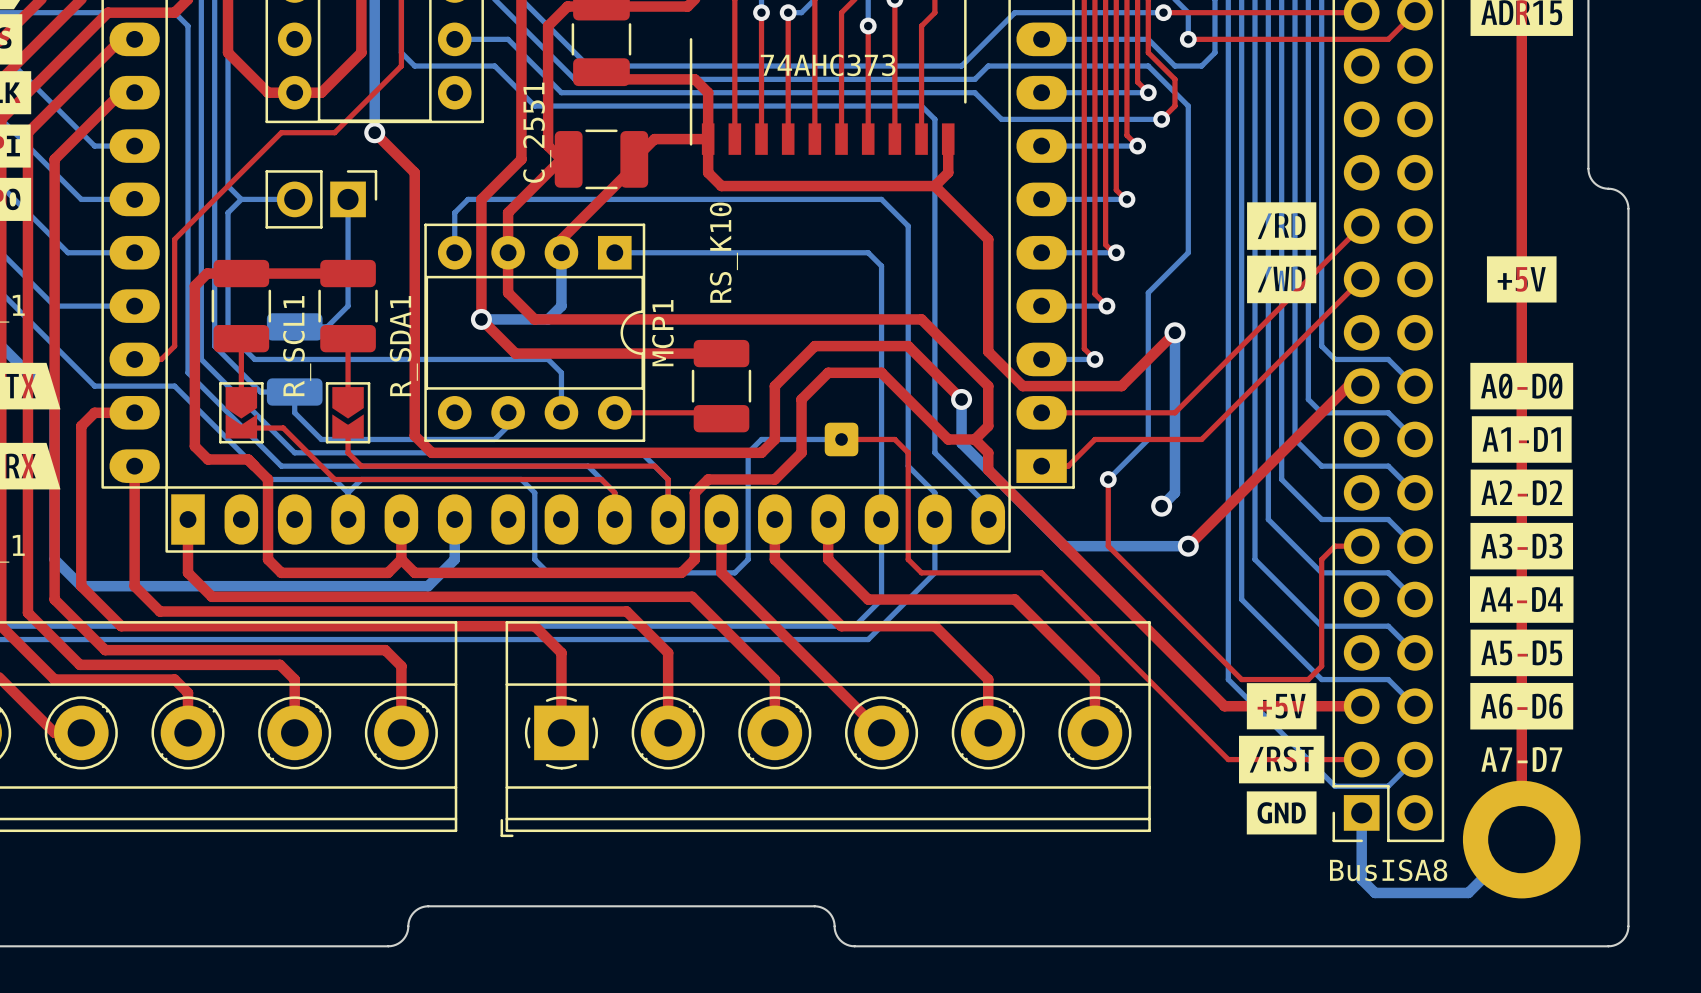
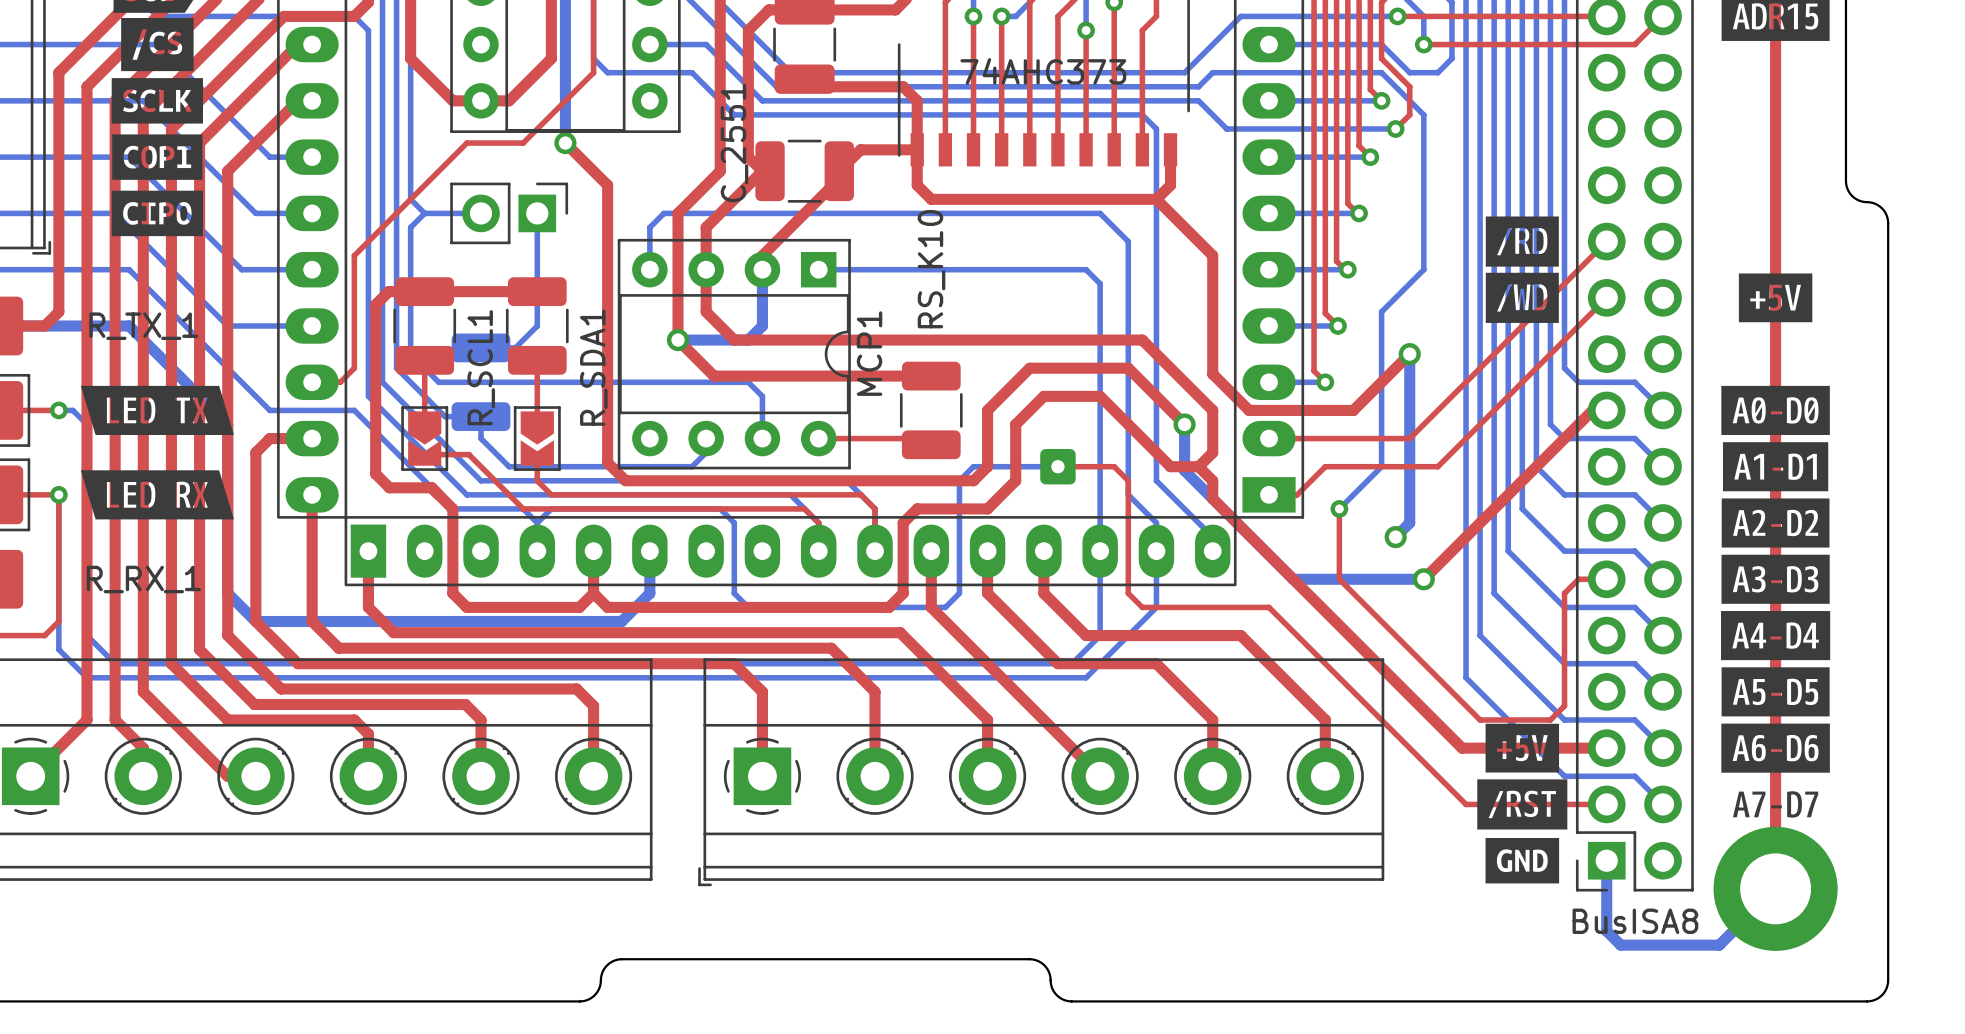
bottom track: (1228, 639) (1228, 679) (1335, 786) (1388, 786) (1415, 759) -> (1466, 677) (1564, 776) (1634, 776) (1663, 804)

